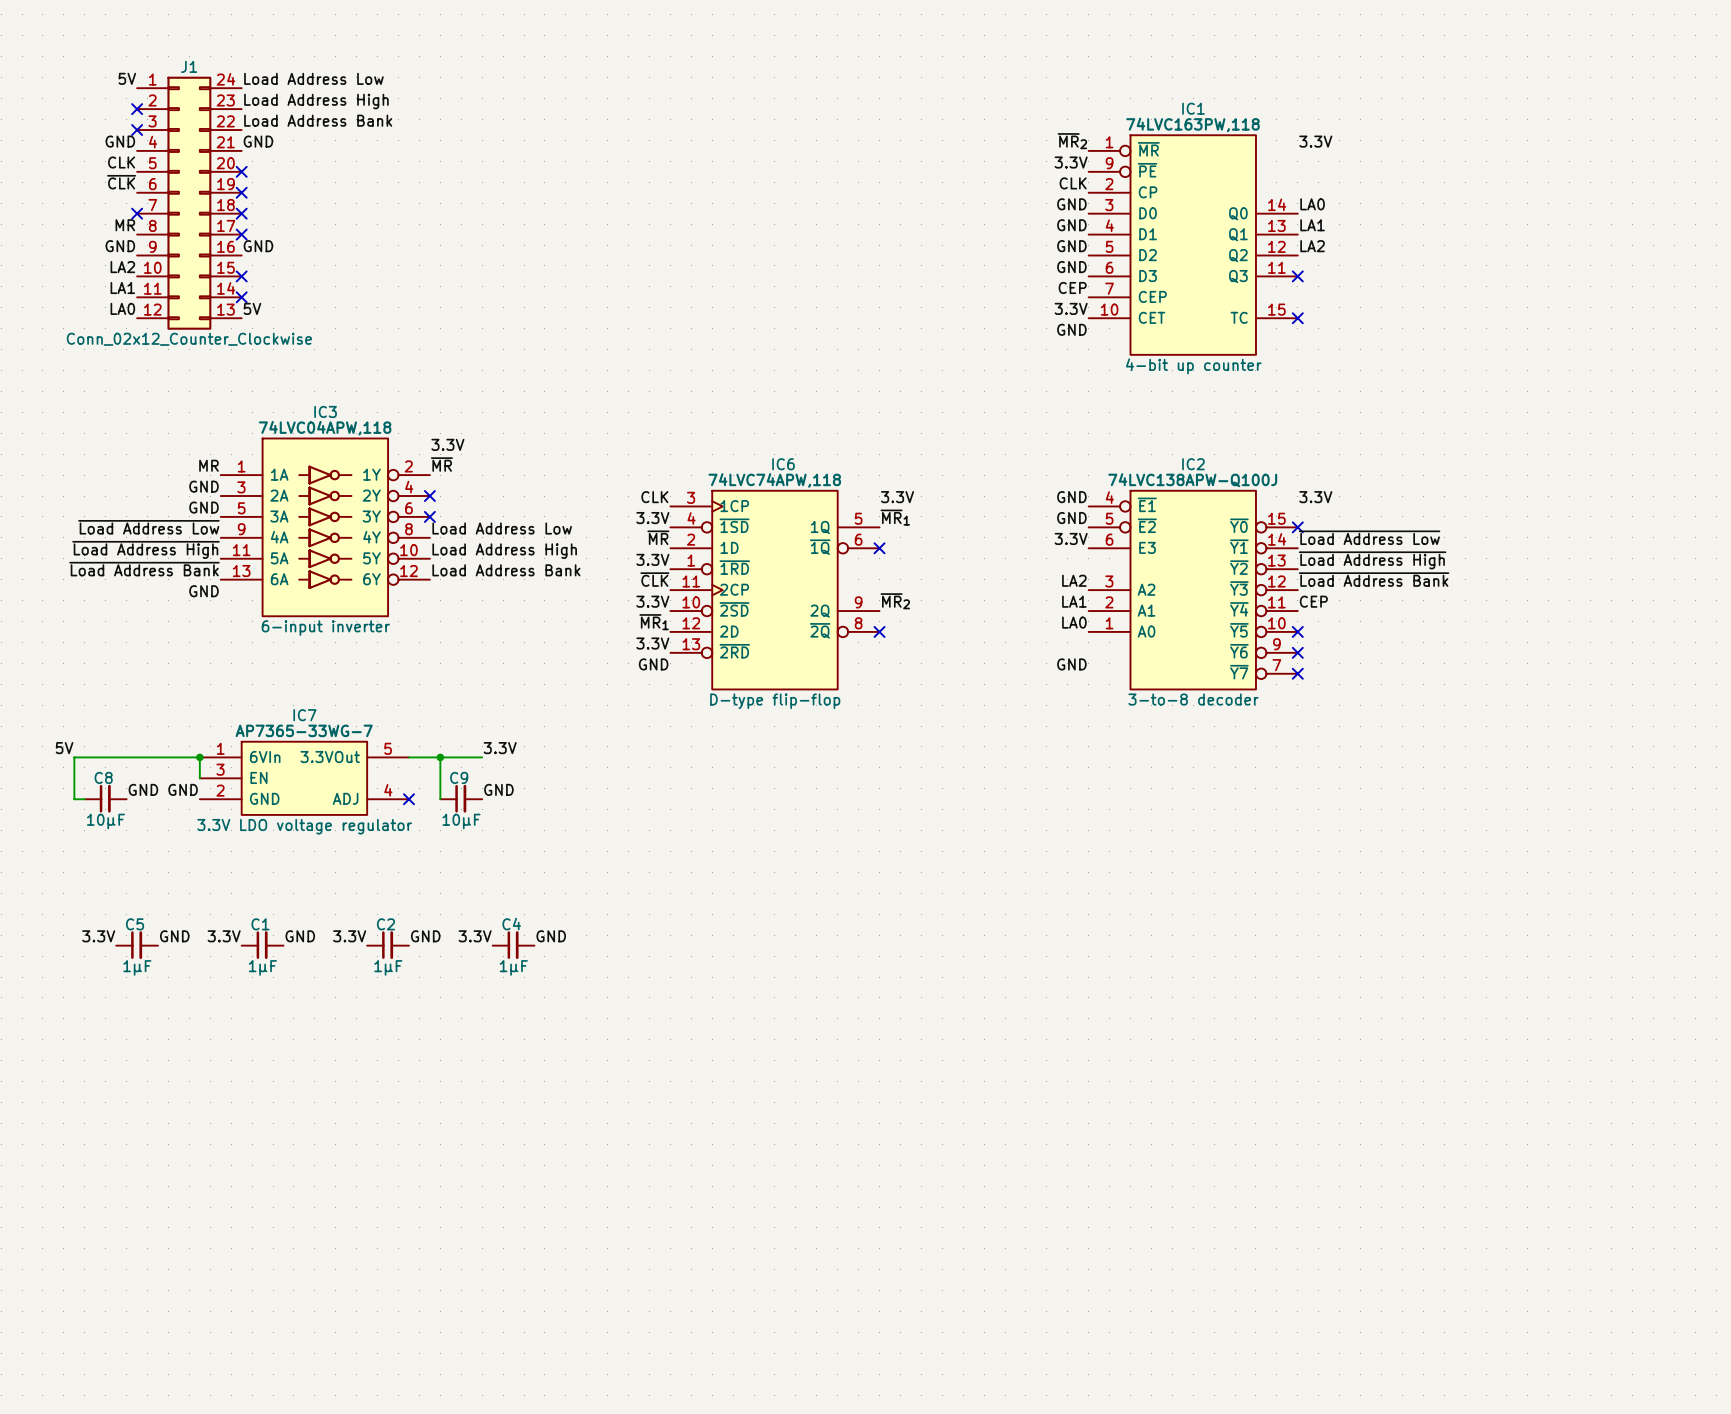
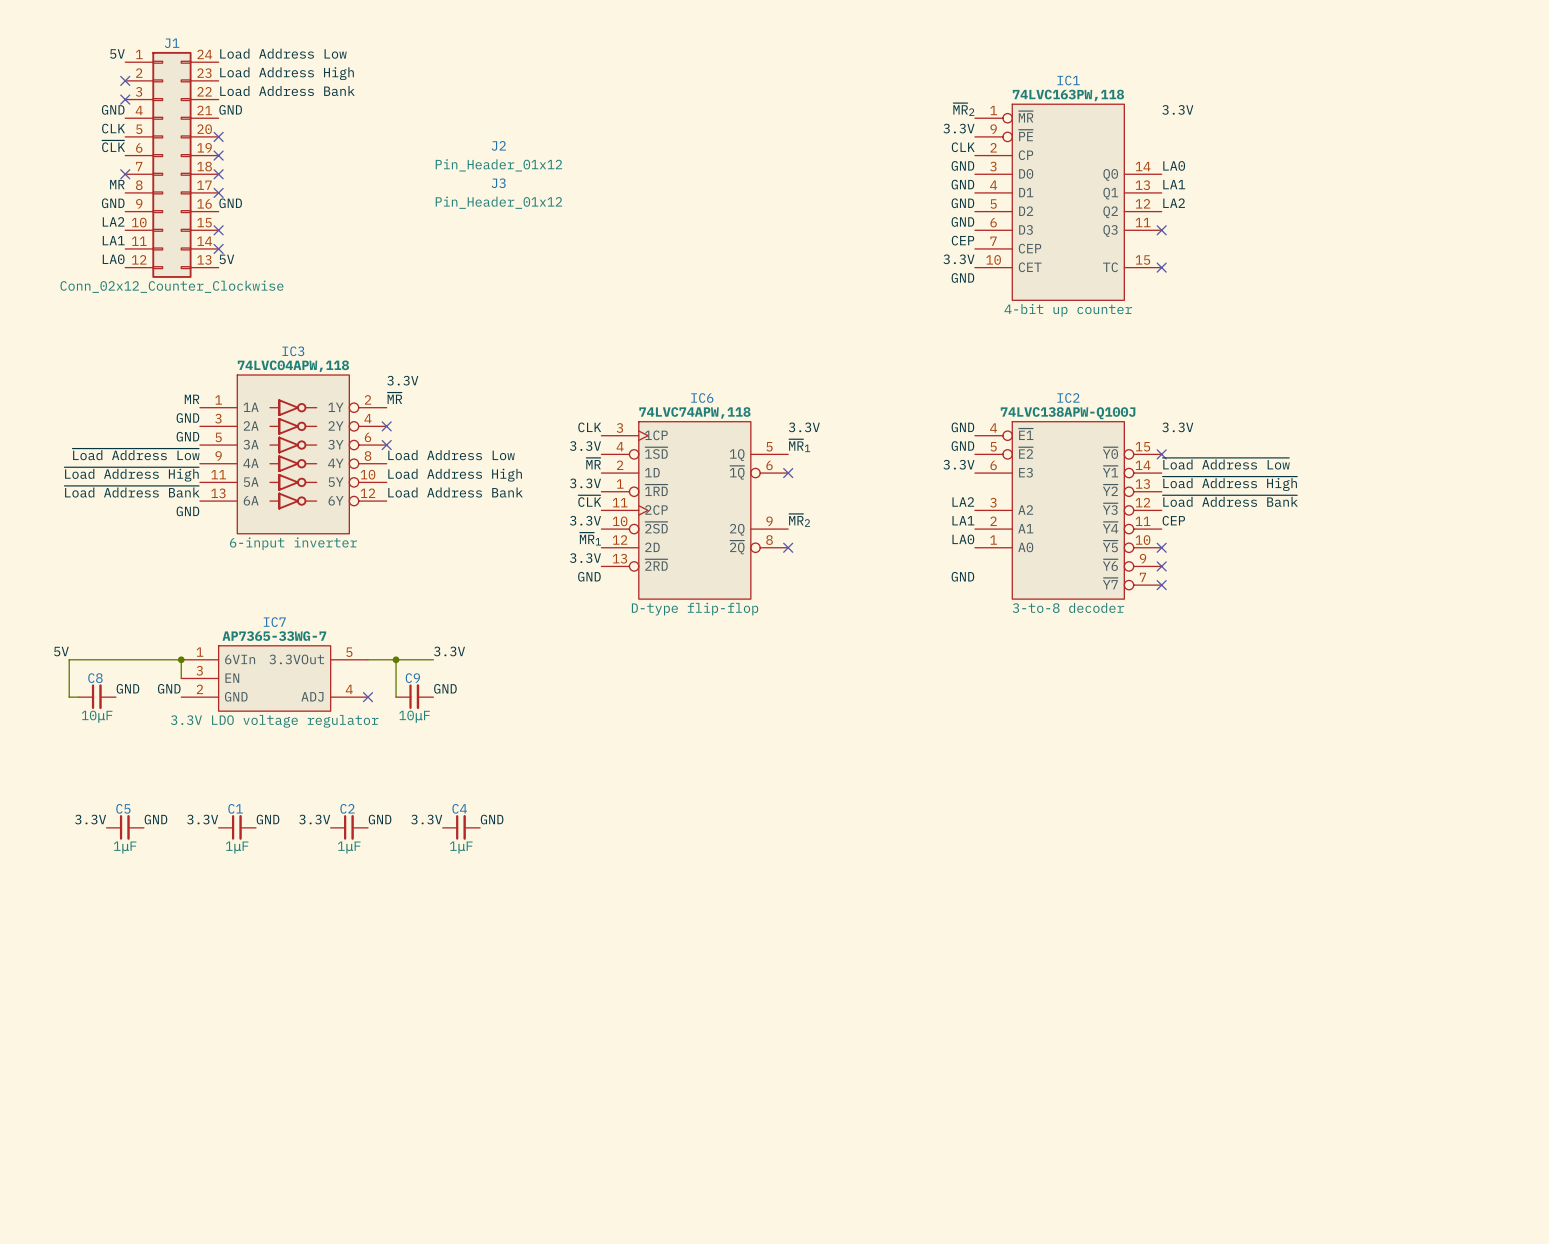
J2: none -> Pin_Header_01x12 (498, 156)
J3: none -> Pin_Header_01x12 (498, 193)

